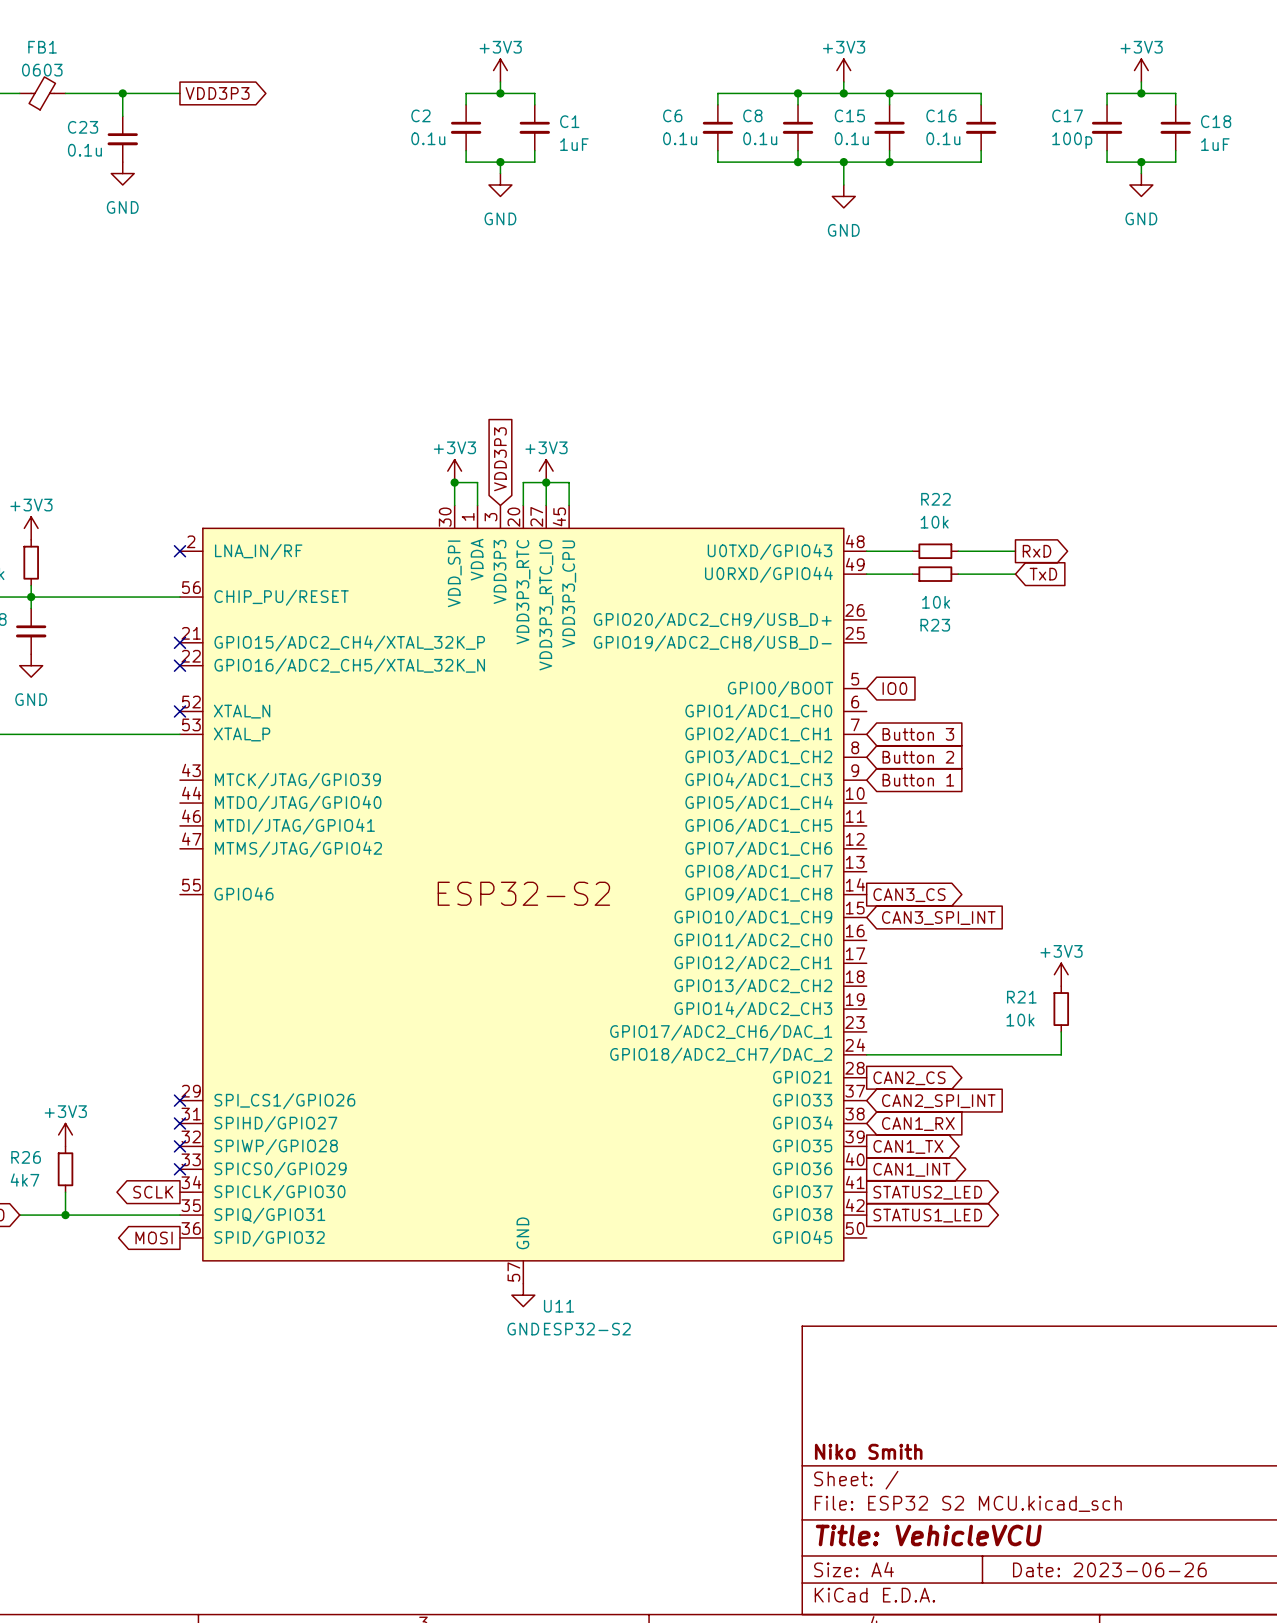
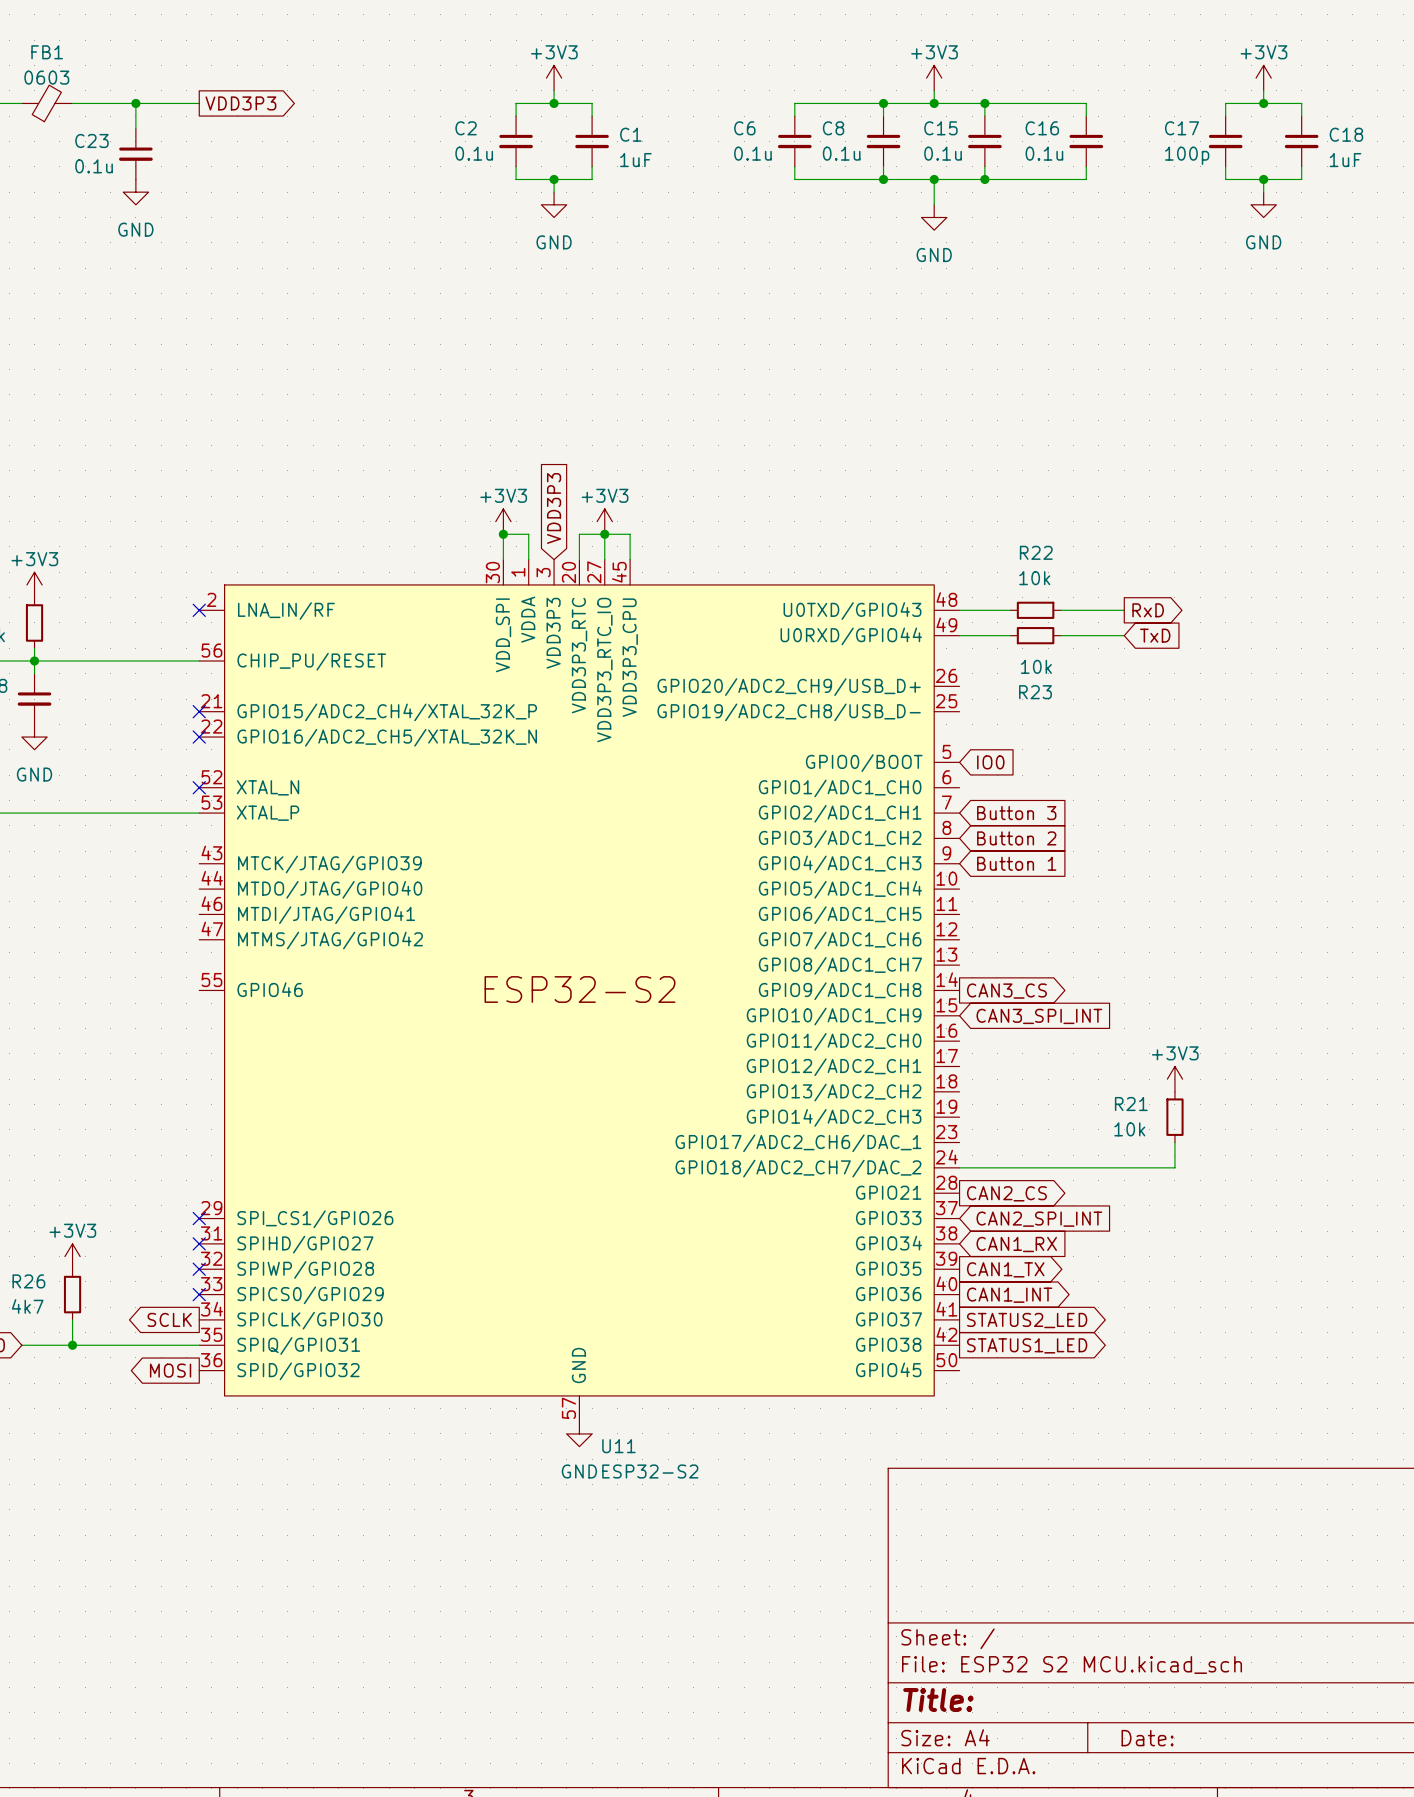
title block: Niko Smith (868, 1451) -> none
title block: Title: VehicleVCU (928, 1535) -> Title: (938, 1700)
title block: Date: 2023-06-26 (1109, 1569) -> Date: (1147, 1738)

